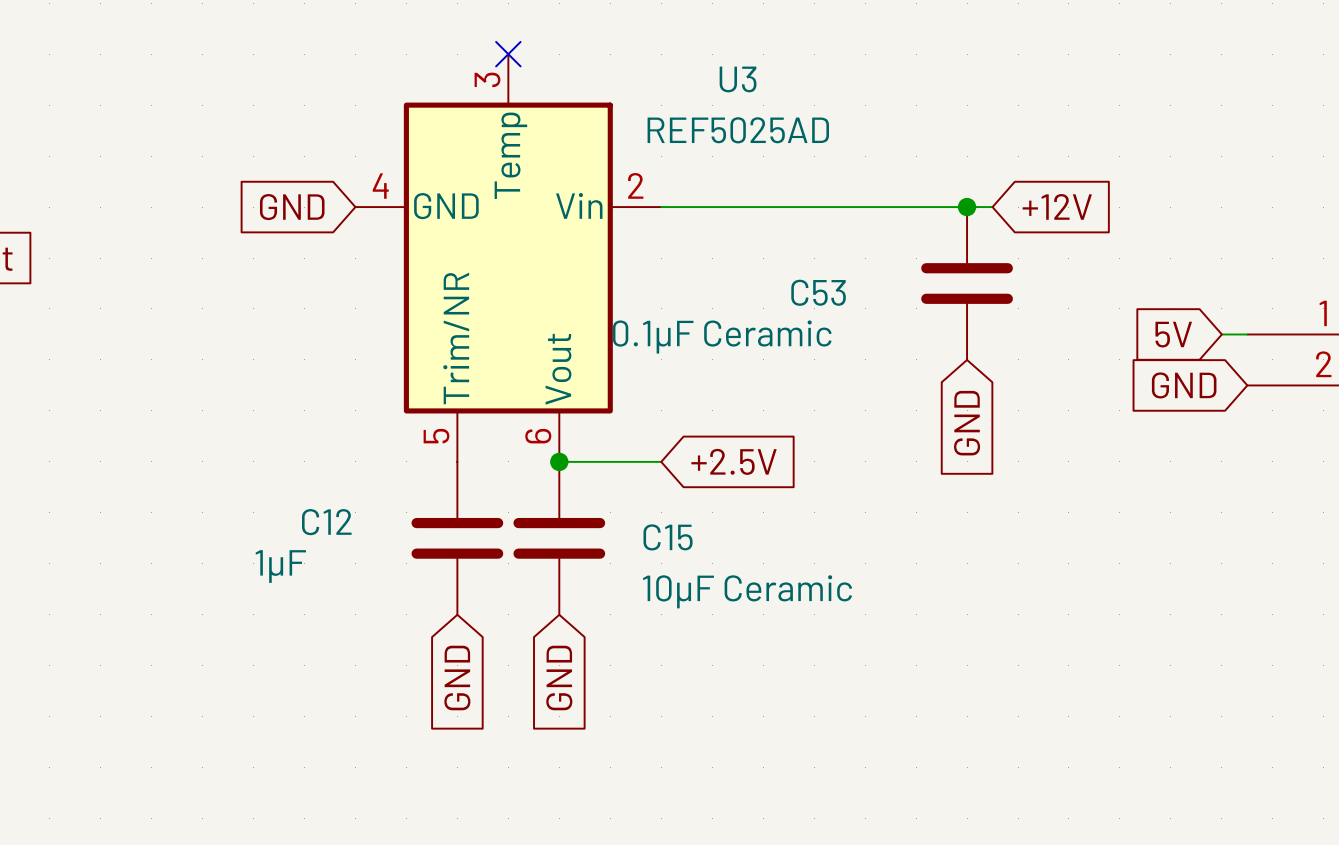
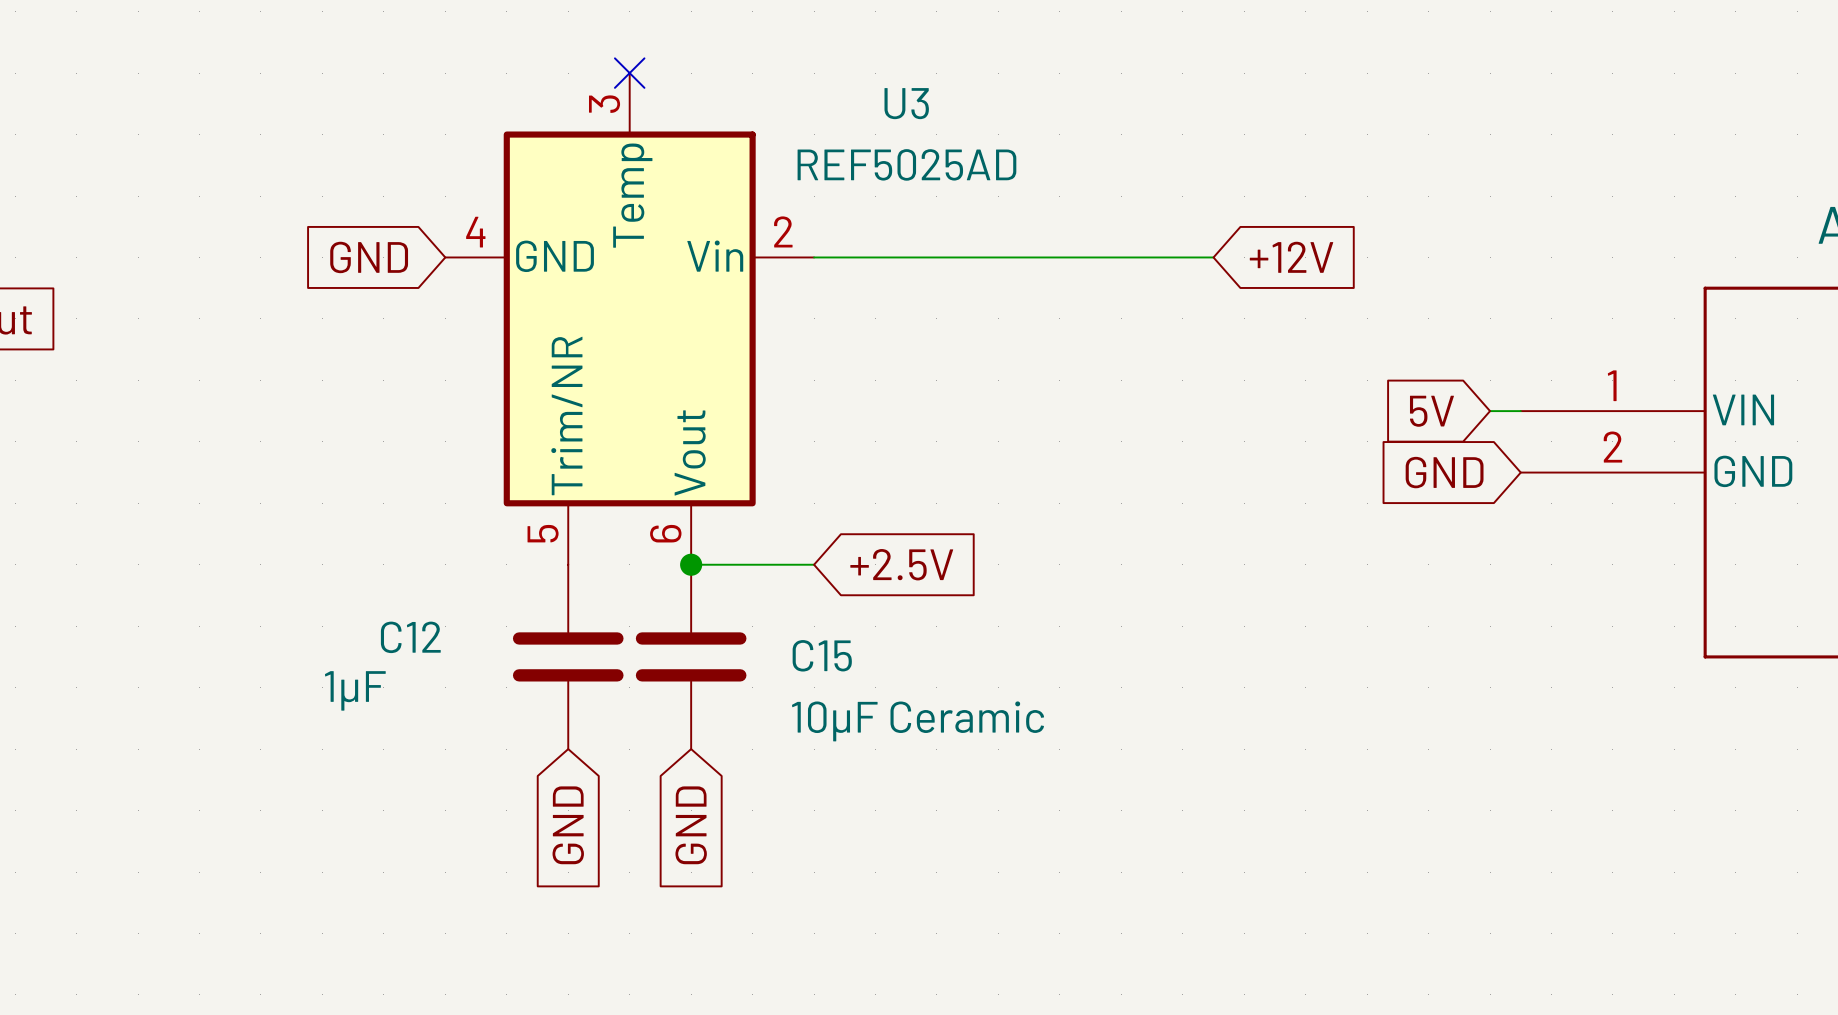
junction: (967, 207) -> none
C53: 0.1µF Ceramic (967, 283) -> none
global label: GND (967, 423) -> none

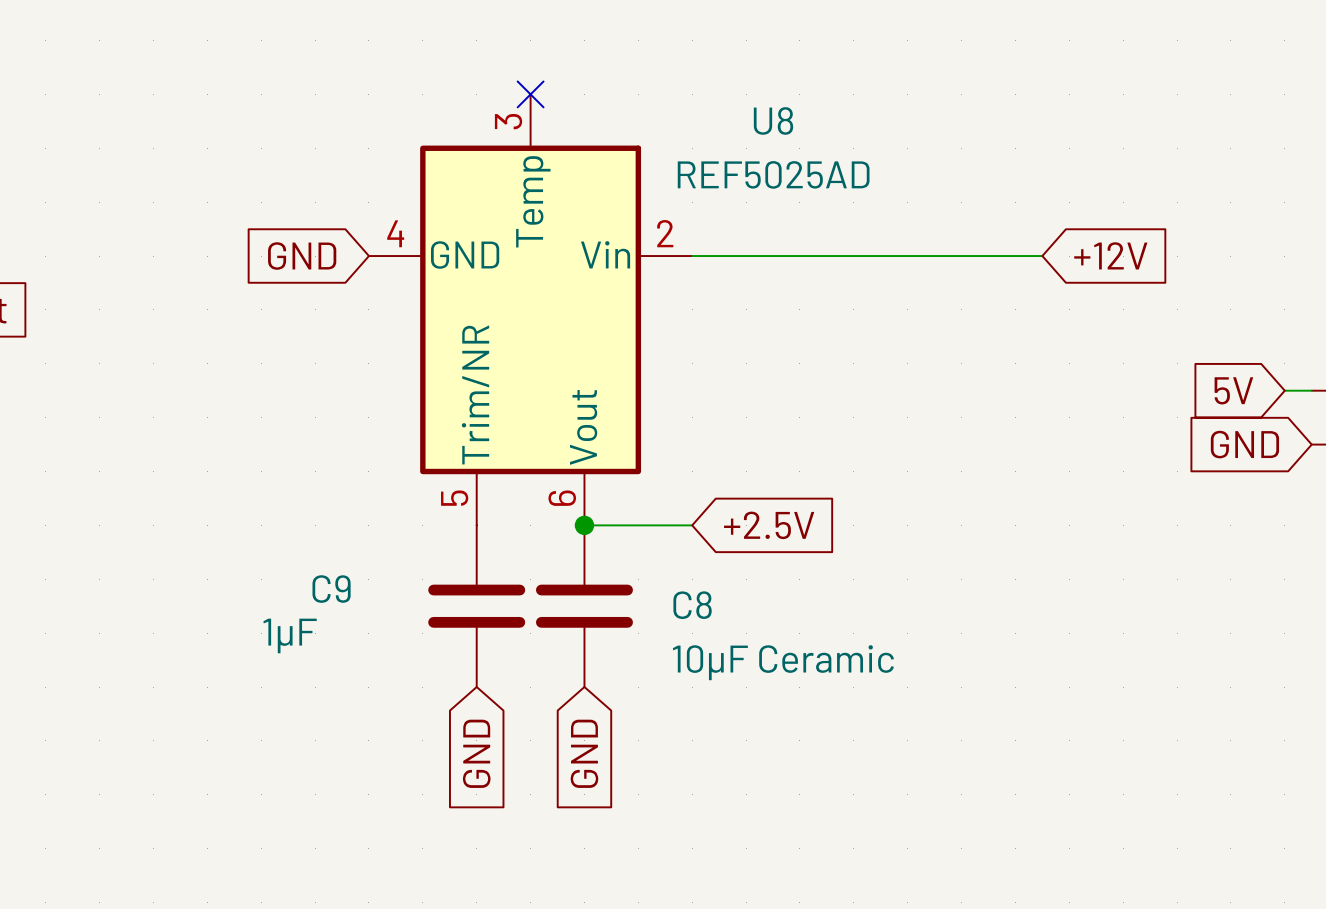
U3 name: U3 (906, 103) -> U8 (773, 120)
C12 name: C12 (410, 637) -> C9 (331, 589)
C15 name: C15 (822, 655) -> C8 (692, 605)

